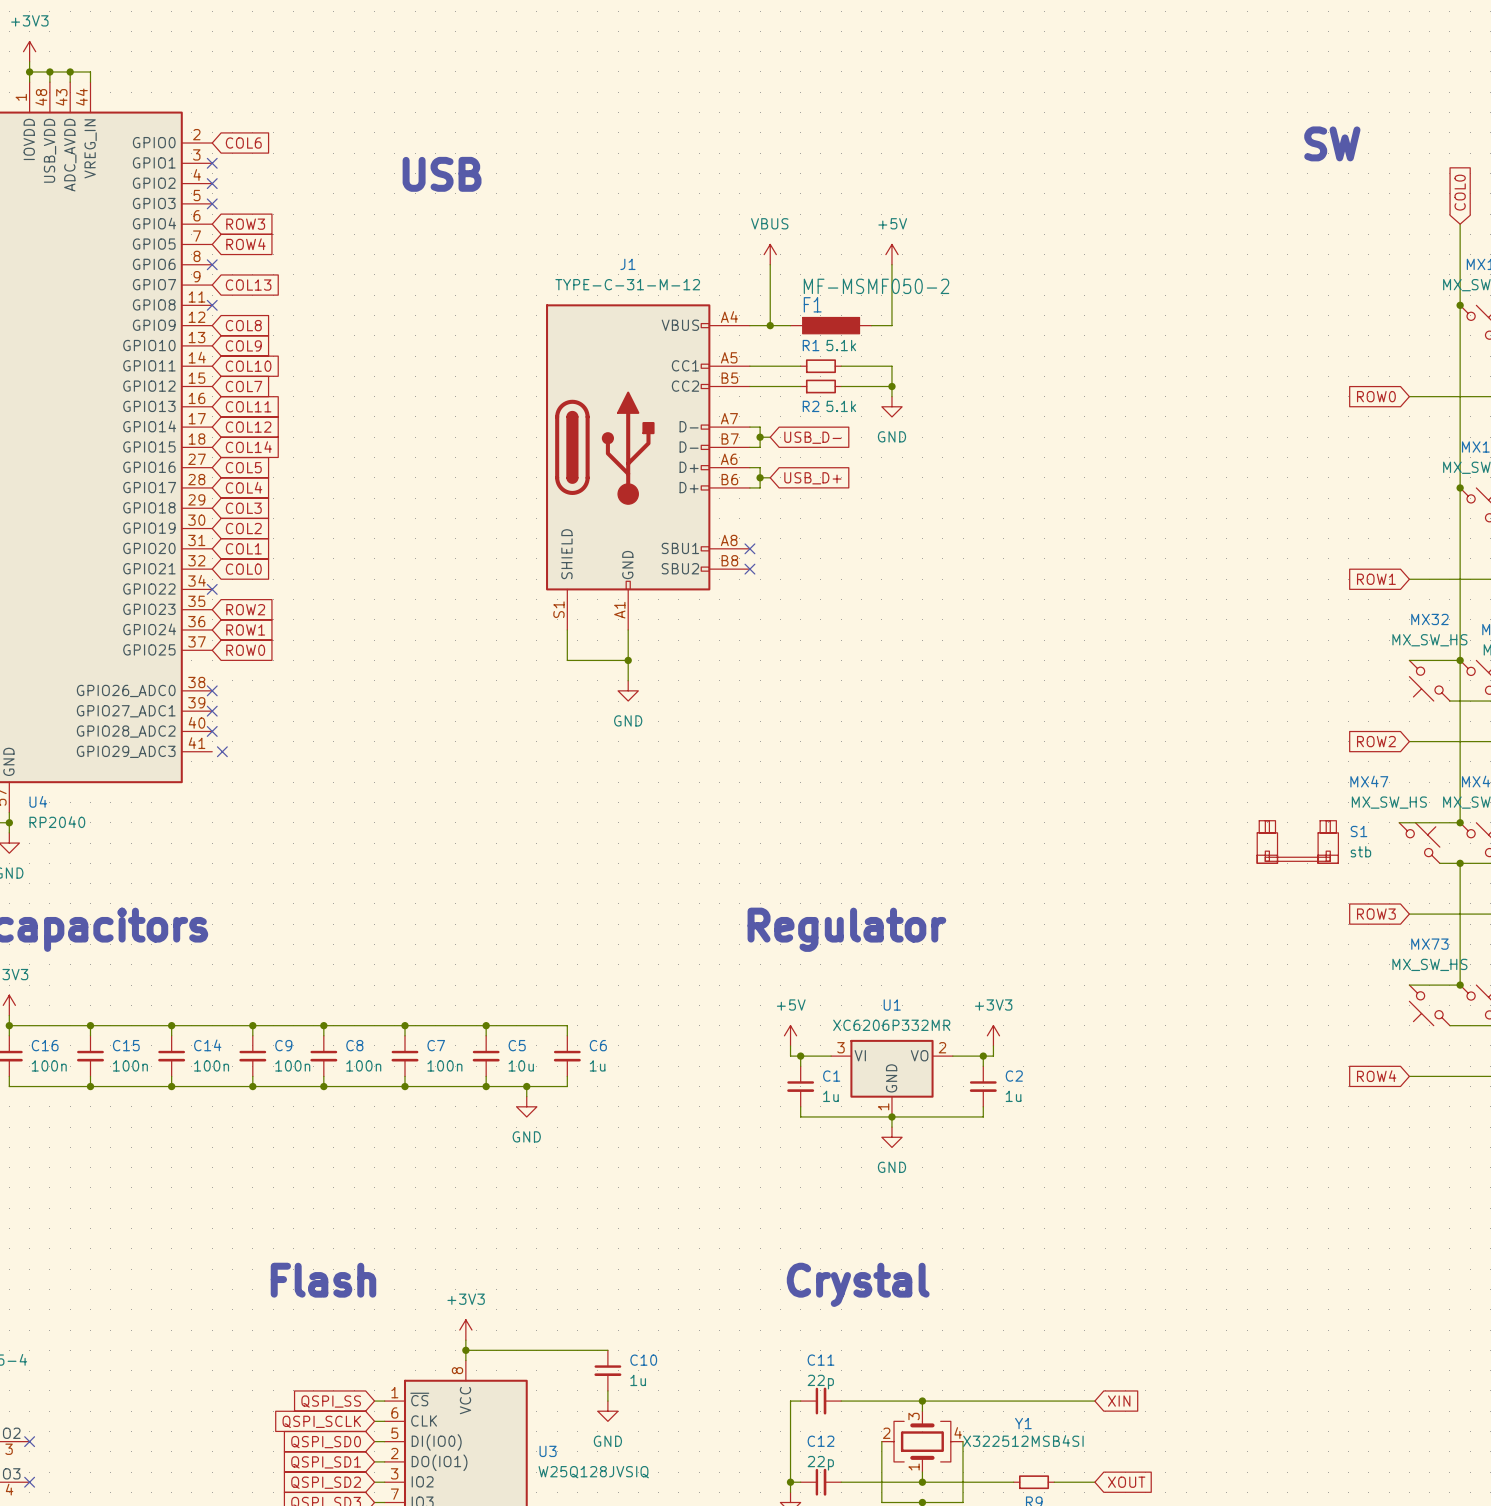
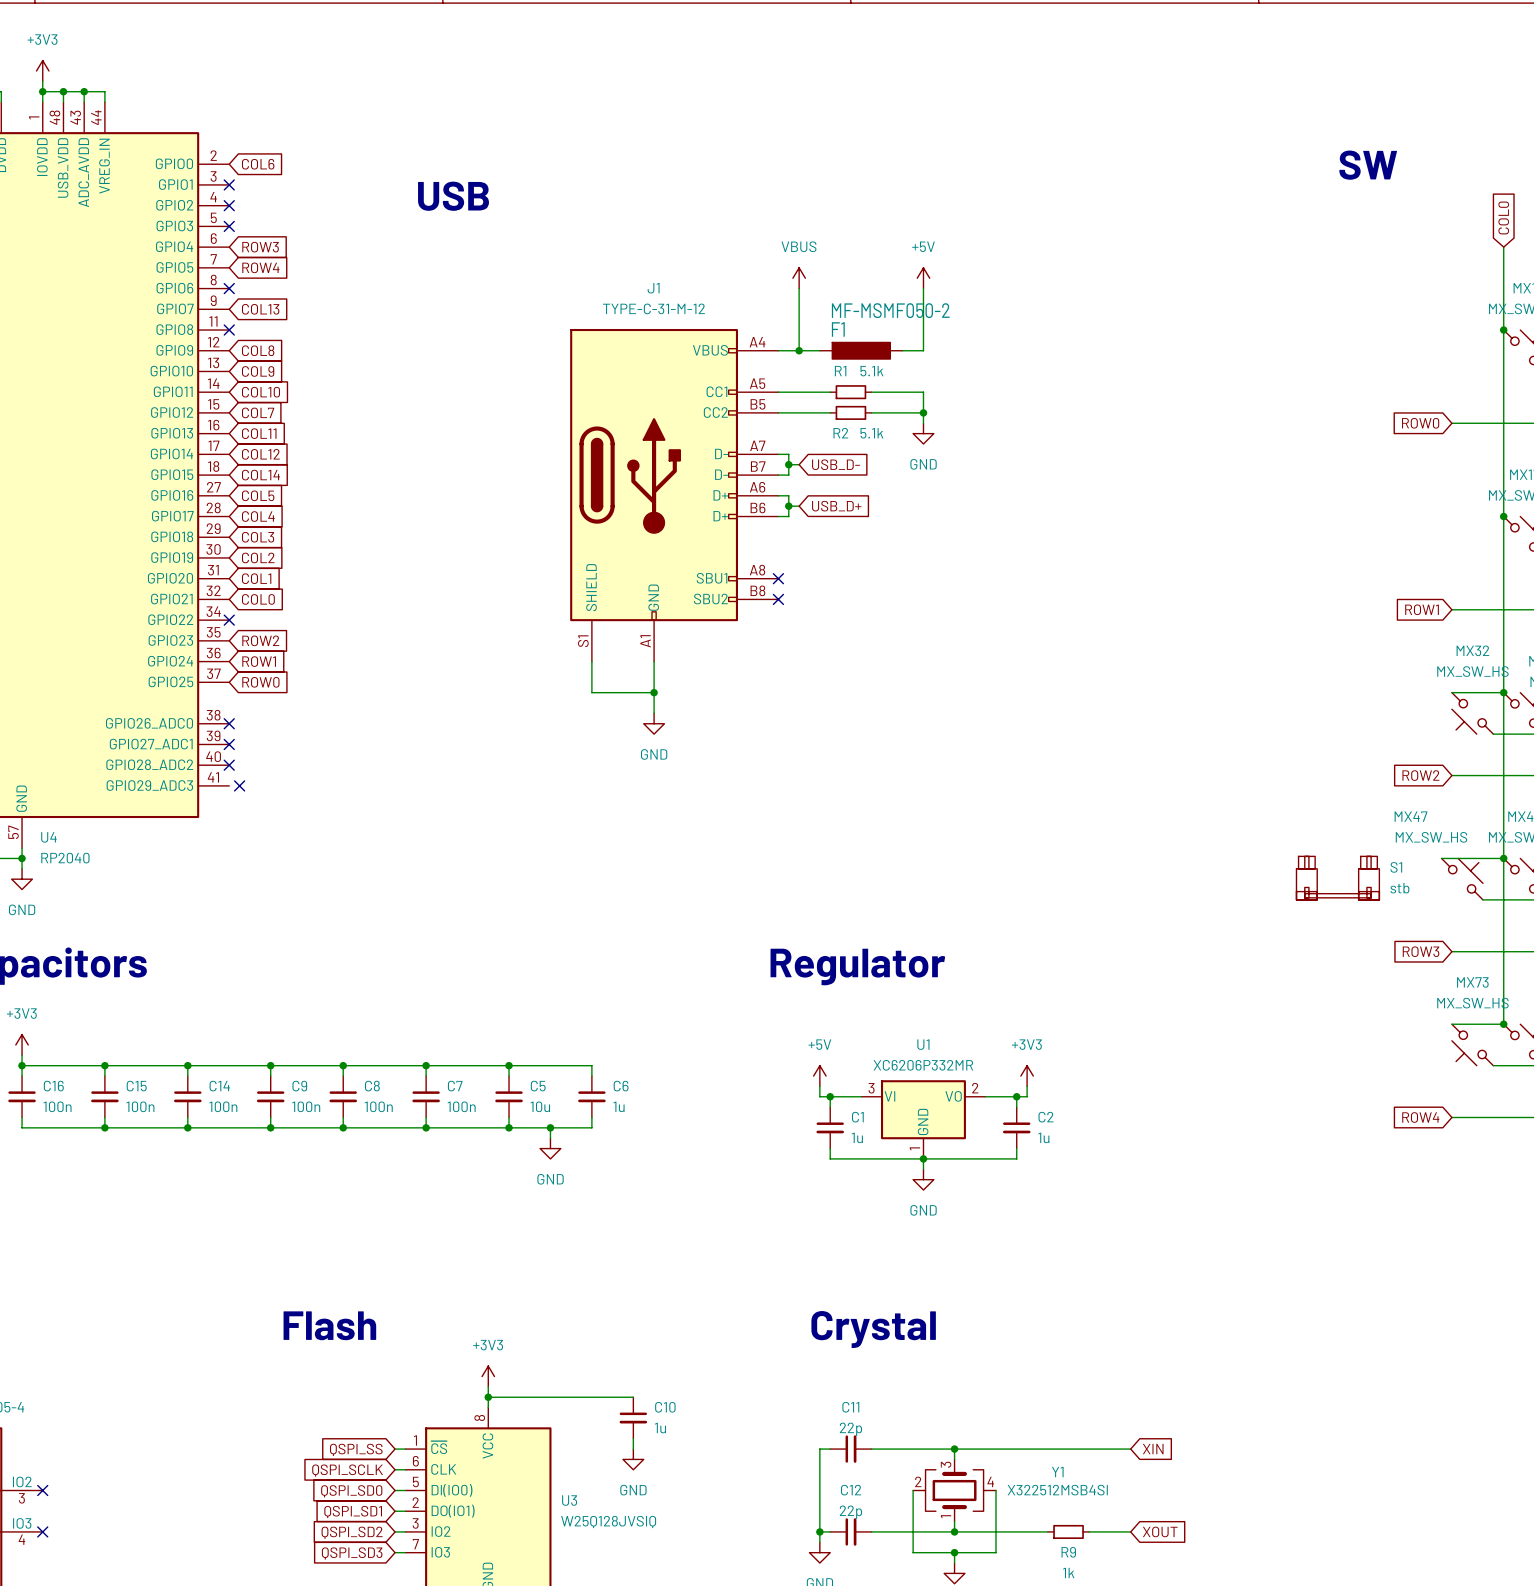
wire: none -> (1503, 858) (1503, 899)
junction: (1460, 863) -> none

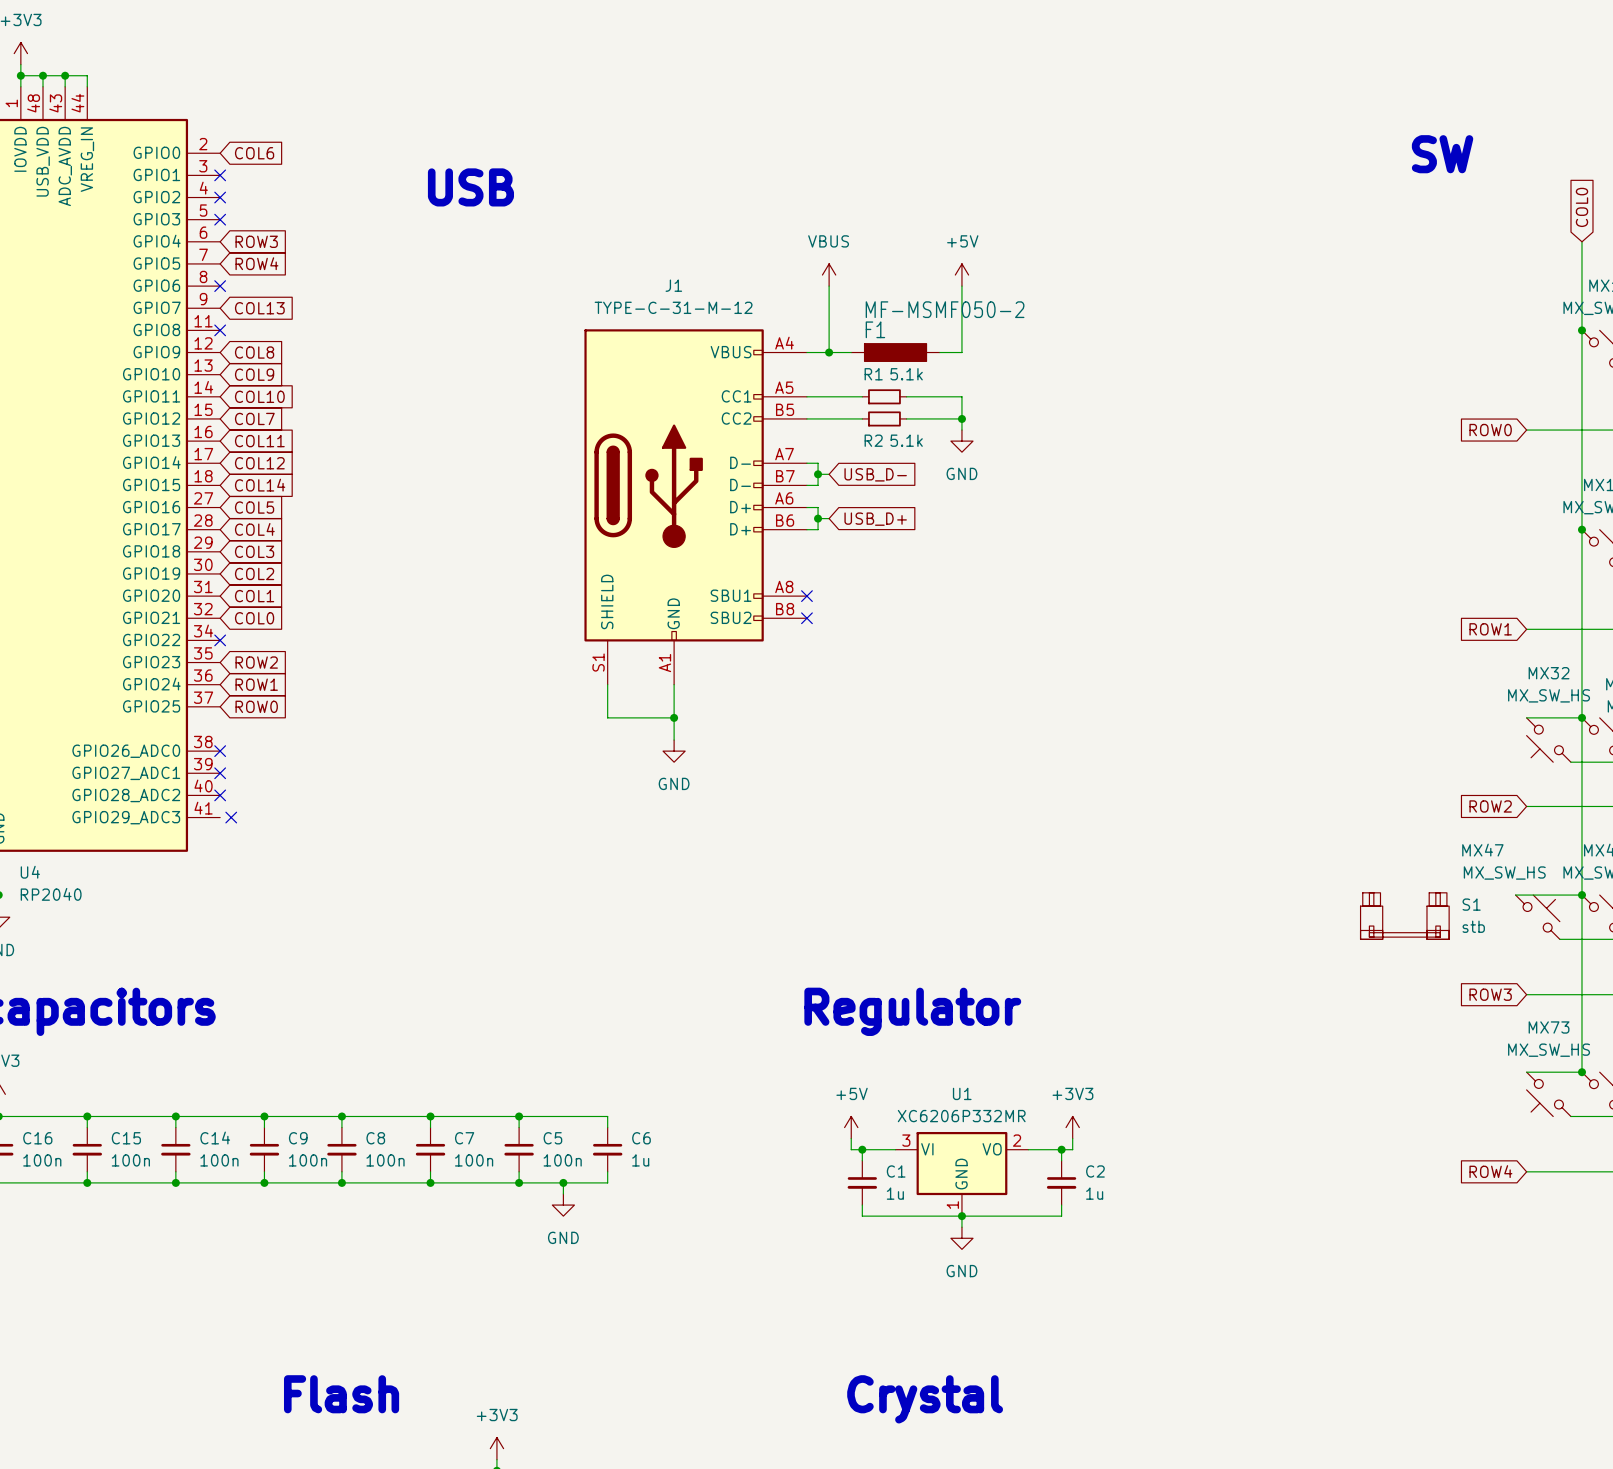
C5 value: 10u (540, 1106) -> 100n (562, 1160)

